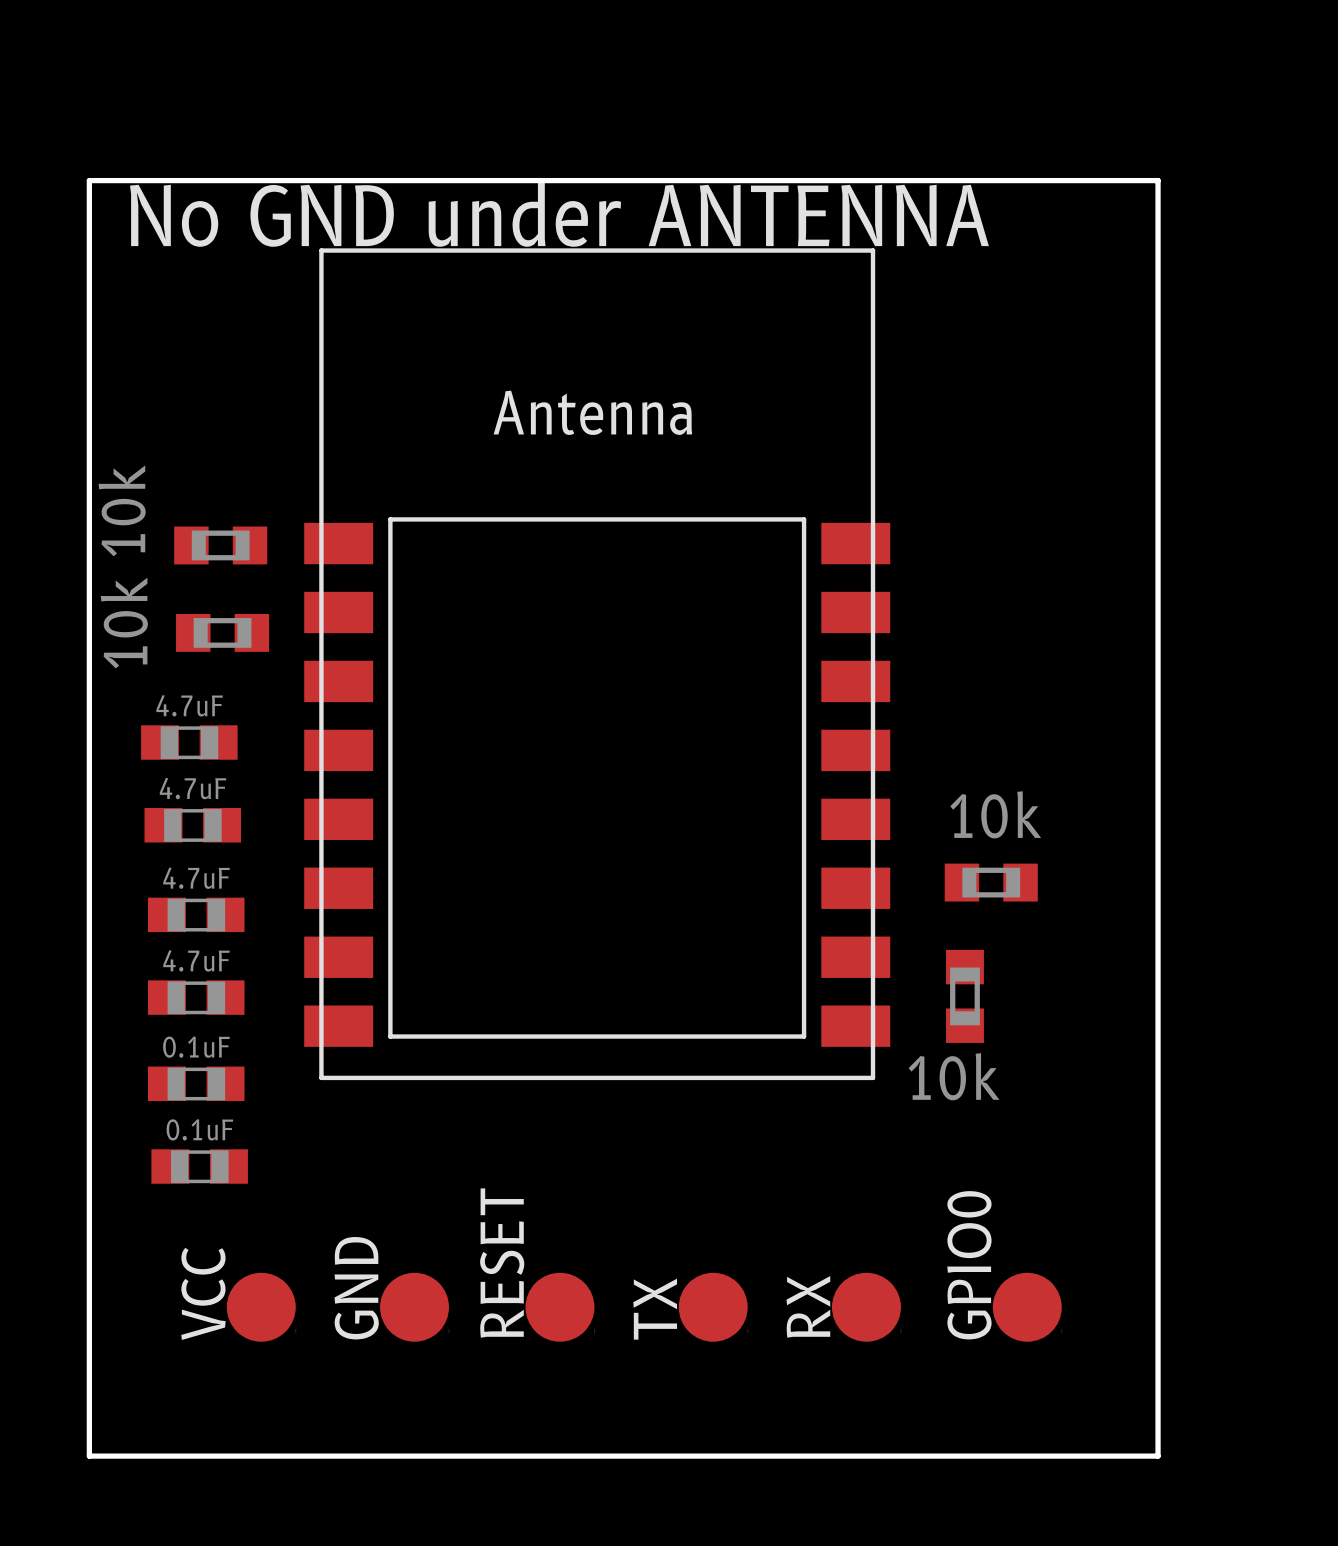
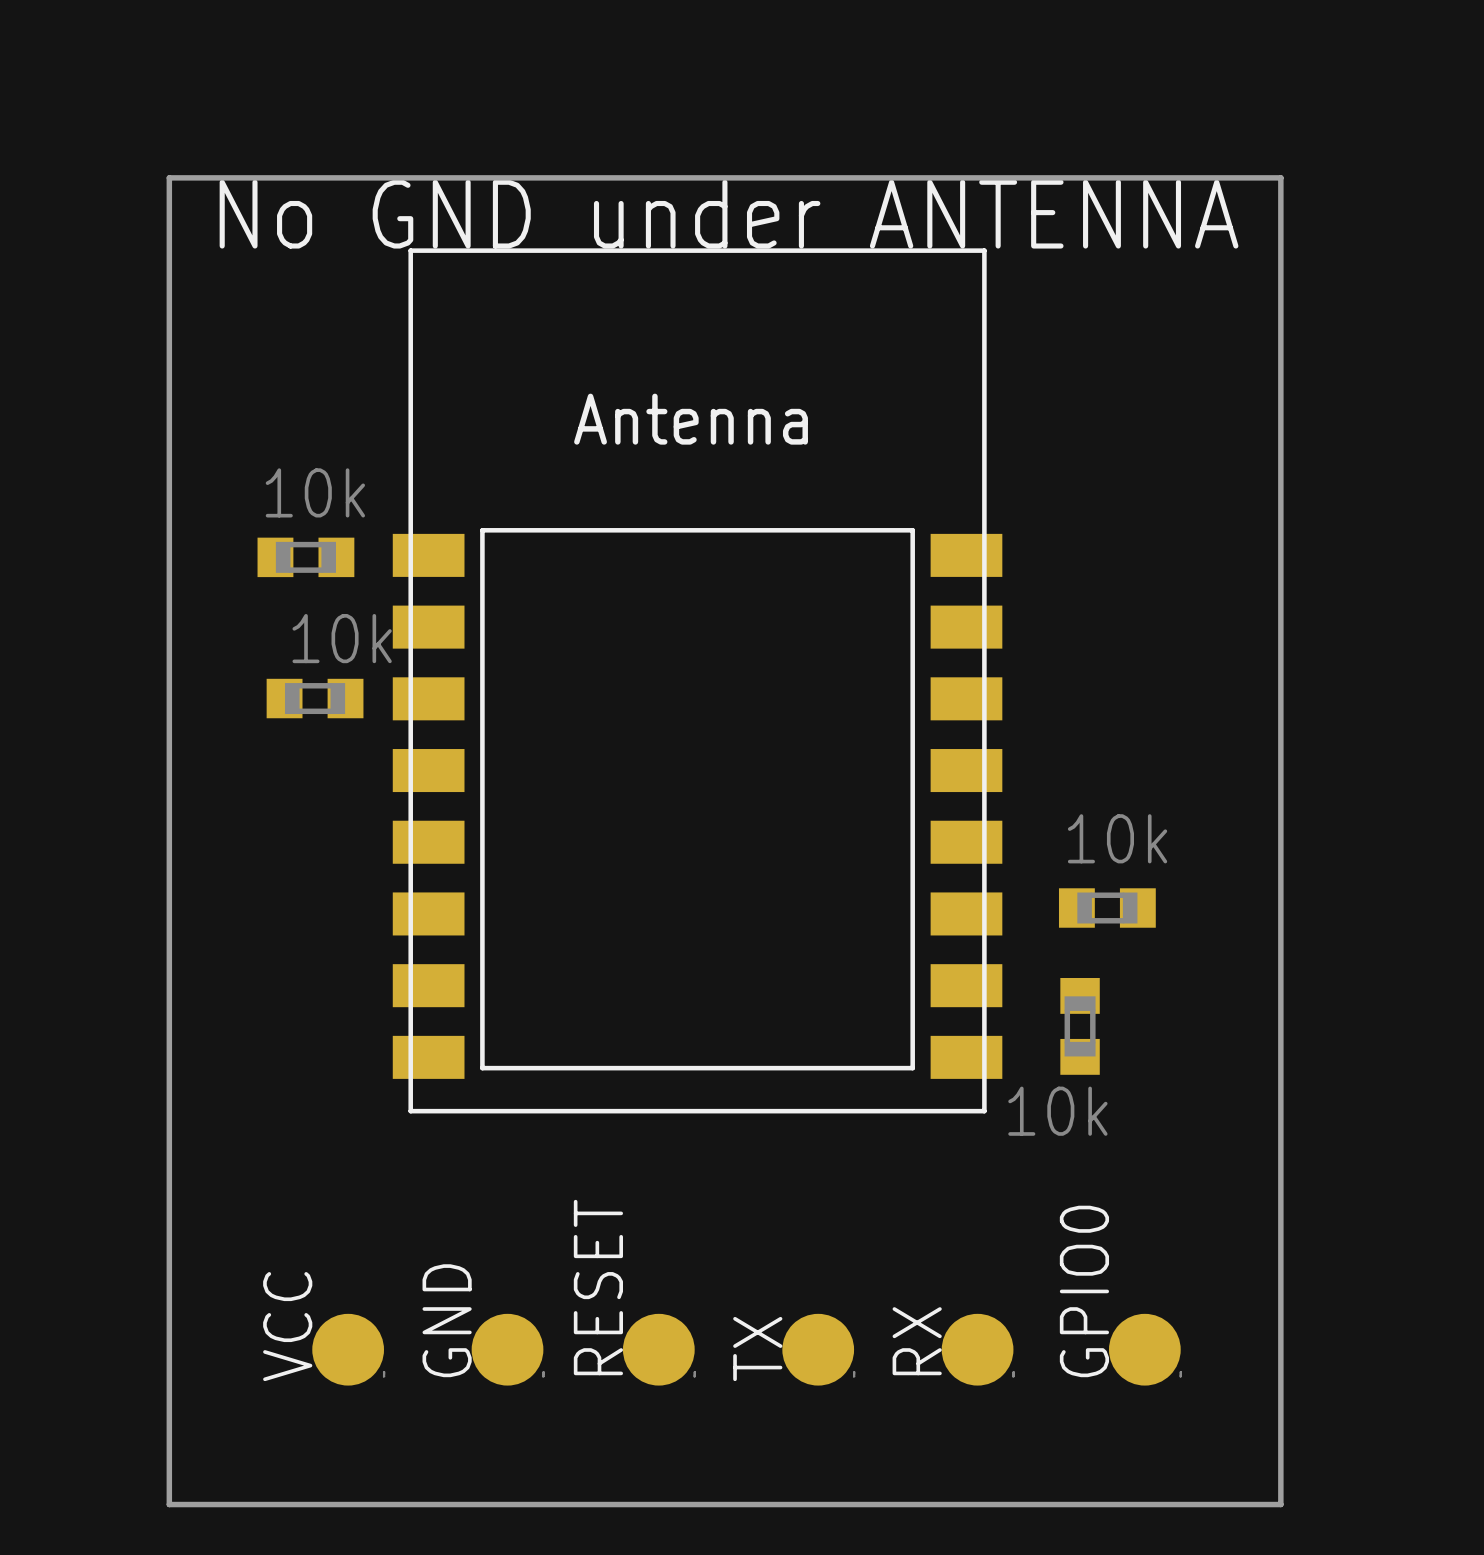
part value rotation: 0° (122, 510) -> 90° clockwise (315, 492)
part value rotation: 0° (124, 623) -> 90° clockwise (342, 638)
part value position: 10k (124, 623) -> 10k (342, 638)
part position: (222, 632) -> (315, 698)
part: 4.7uF (189, 742) -> none
part: 4.7uF (192, 825) -> none
part: 4.7uF (196, 914) -> none
part: 4.7uF (196, 997) -> none
part: 0.1uF (196, 1083) -> none
part: 0.1uF (199, 1166) -> none

